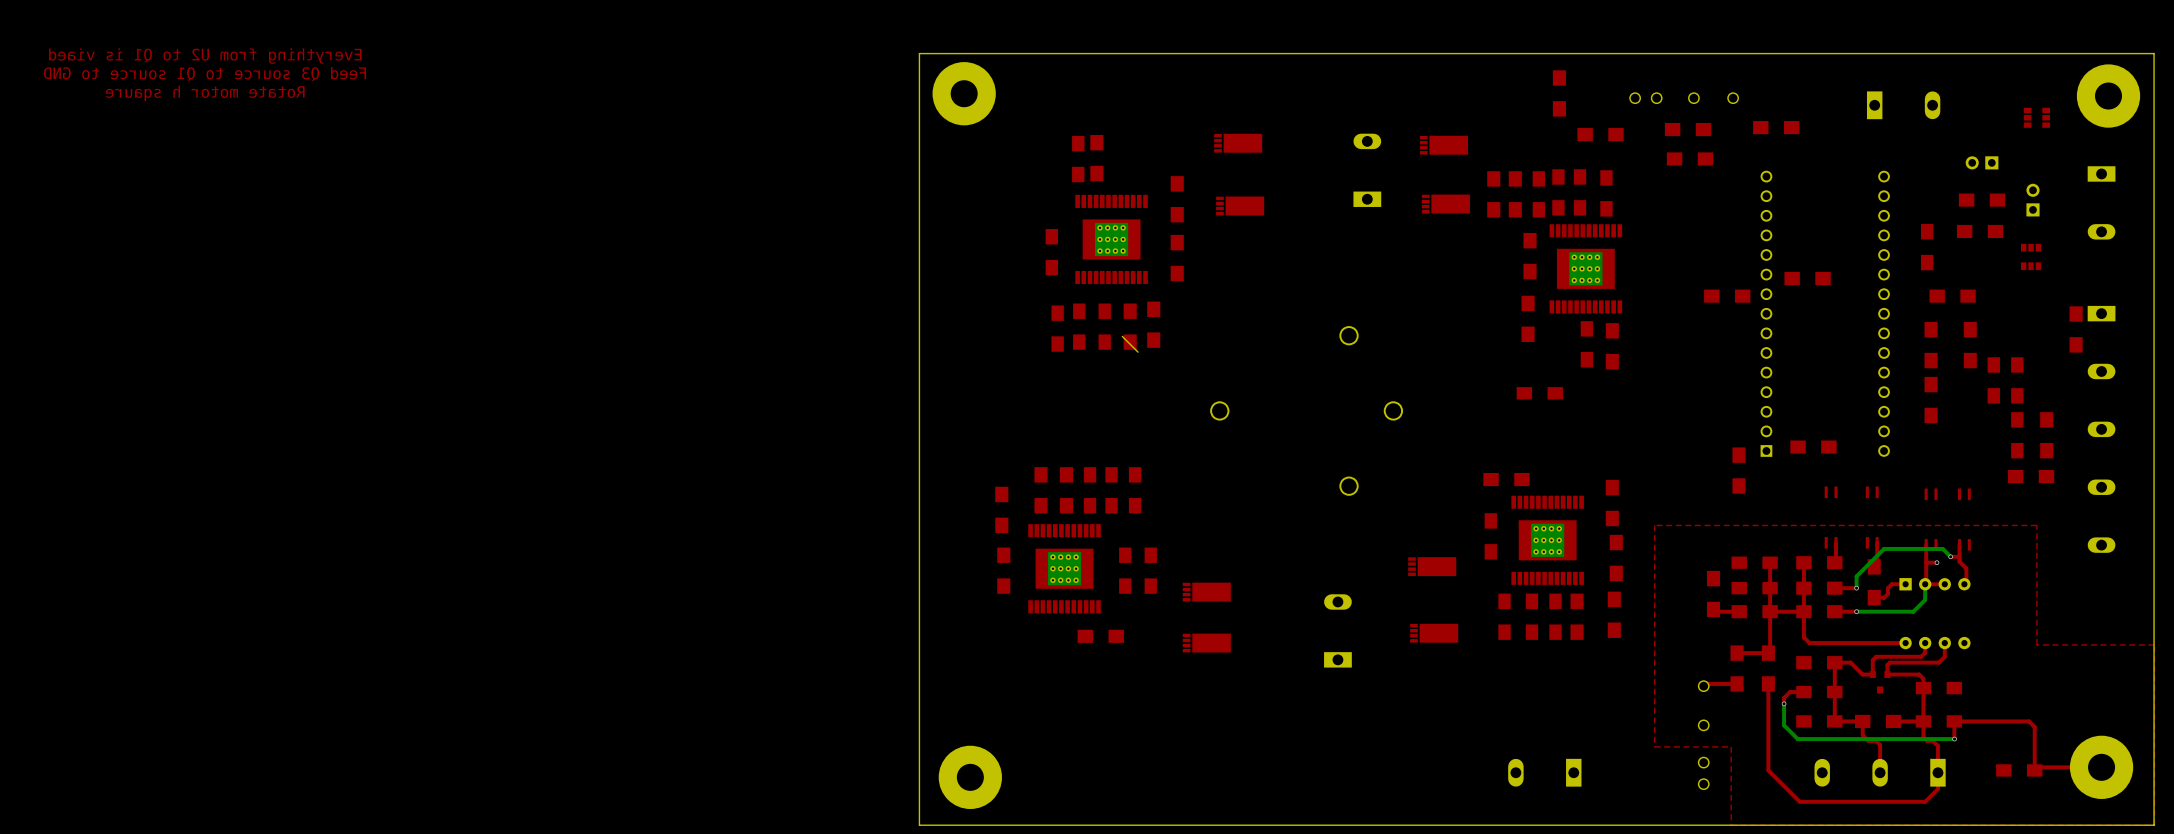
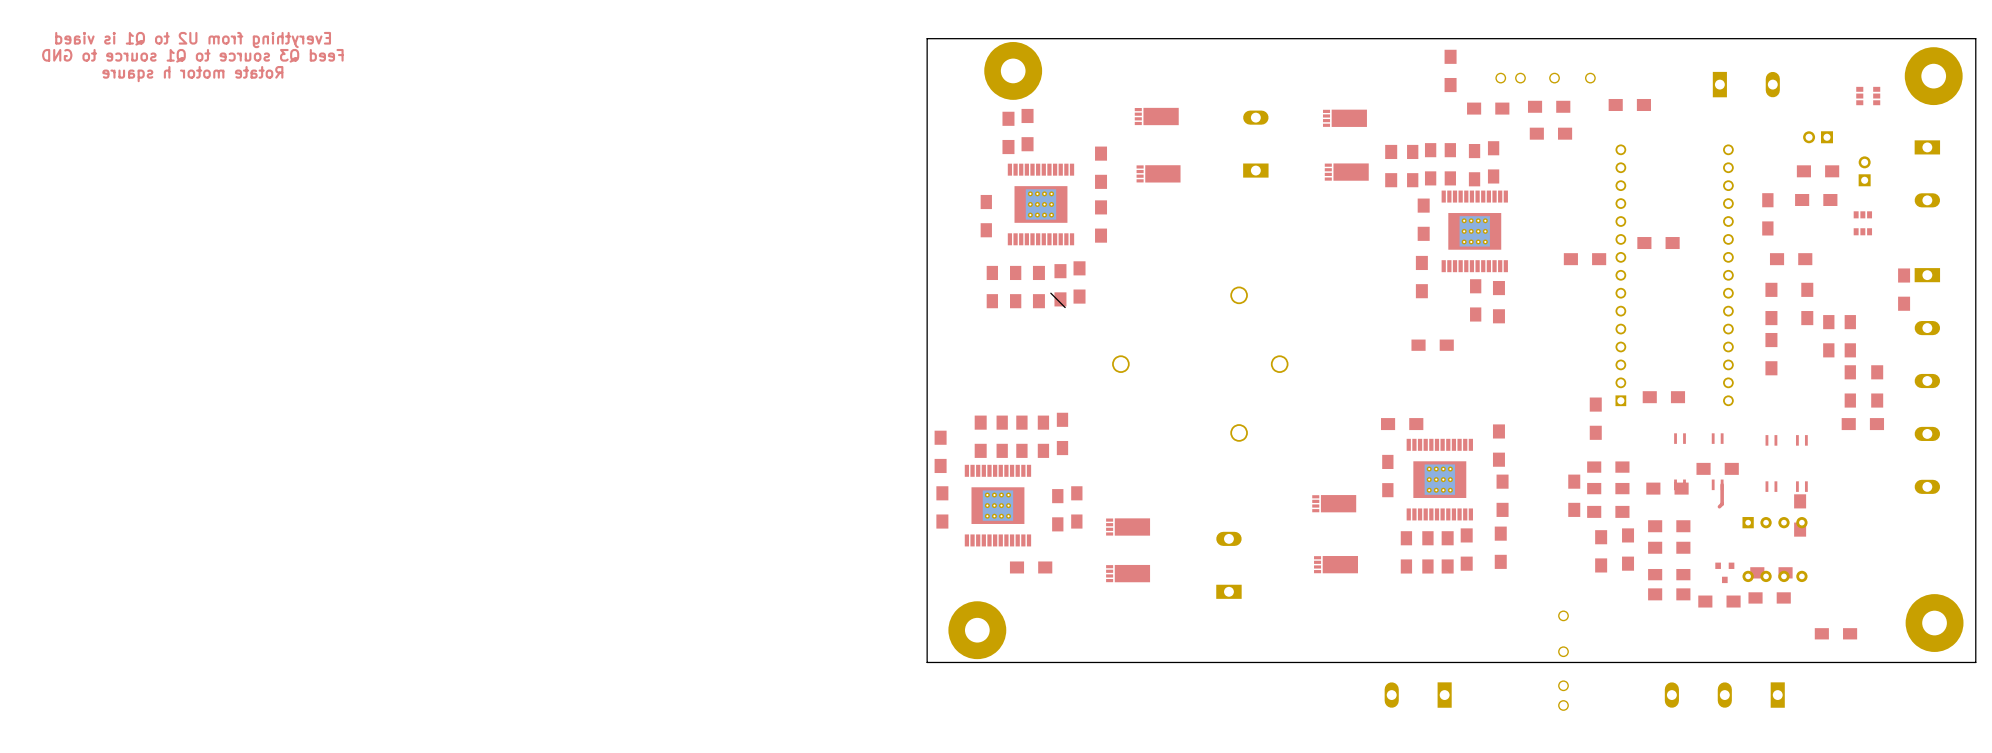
board edge: (2154, 53) (919, 53) (919, 825) (2154, 825) (2154, 53) -> (1975, 38) (1975, 662) (927, 662) (927, 38) (1975, 38)
part position: (964, 93) -> (1013, 70)
part position: (1559, 93) -> (1450, 70)
part position: (1600, 134) -> (1488, 108)
part position: (1238, 143) -> (1156, 116)
part position: (1443, 145) -> (1344, 118)
part: none -> (1027, 130)
part: (1078, 159) -> none
part: none -> (1493, 162)
part: (1493, 194) -> none
part position: (1177, 199) -> (1101, 167)
part position: (1445, 204) -> (1346, 172)
part position: (1240, 205) -> (1158, 173)
part position: (1111, 239) -> (1040, 204)
part position: (1051, 252) -> (986, 216)
part position: (1530, 256) -> (1423, 219)
part position: (1177, 258) -> (1101, 221)
part position: (1585, 268) -> (1474, 231)
part position: (1528, 318) -> (1421, 277)
part: none -> (1079, 282)
part footprint: [1605, 323, 1619, 370] -> [1470, 279, 1482, 322]
part: (1057, 328) -> none
board edge: (1122, 336) (1138, 352) -> (1050, 293) (1065, 307)
part: none -> (1498, 302)
part: (1586, 344) -> none
part position: (1539, 393) -> (1432, 345)
part position: (1506, 479) -> (1402, 424)
part: none -> (1062, 433)
part: (1041, 490) -> none
part position: (1612, 503) -> (1498, 445)
part: none -> (940, 451)
part: (1001, 509) -> none
part: none -> (1608, 467)
part: none -> (1717, 468)
top zone outline: (2036, 525) (2036, 645) (2154, 645) (2154, 825) (1731, 825) (1731, 746) (1654, 746) (1654, 525) (2036, 525) -> none
part position: (1490, 536) -> (1387, 476)
part position: (1547, 540) -> (1439, 479)
top track: (1836, 542) (1834, 562) -> none
top track: (1926, 544) (1926, 583) (1944, 584) -> none
top track: (1959, 544) (1959, 561) (1966, 568) (1966, 582) (1964, 584) -> none
part: none -> (1574, 495)
bottom track: (1950, 556) (1942, 548) (1884, 548) (1856, 576) (1856, 588) -> none
via: (1950, 556) -> none
top track: (1959, 556) (1950, 556) -> none
part position: (1616, 557) -> (1502, 495)
part position: (1754, 562) -> (1608, 488)
top track: (1770, 562) (1770, 651) -> none
top track: (1803, 562) (1803, 637) (1809, 643) (1905, 643) -> none
part position: (1819, 562) -> (1667, 488)
top track: (1936, 562) (1926, 562) -> none
via: (1936, 562) -> none
part position: (1432, 566) -> (1334, 503)
part: none -> (1076, 507)
part position: (1064, 568) -> (997, 505)
part position: (1003, 570) -> (942, 507)
part: (1125, 570) -> none
part: none -> (1608, 511)
part: none -> (1800, 515)
part: (1874, 582) -> none
top track: (1905, 584) (1891, 584) (1884, 597) (1874, 597) -> none
bottom track: (1925, 584) (1925, 599) (1913, 611) (1856, 611) -> none
part: (1754, 588) -> none
top track: (1856, 588) (1834, 588) -> none
via: (1856, 588) -> none
part position: (1206, 592) -> (1128, 527)
part: (1713, 594) -> none
top track: (1713, 609) (1715, 611) (1739, 611) -> none
part: none -> (1500, 547)
part: (1754, 611) -> none
top track: (1803, 611) (1770, 611) -> none
top track: (1856, 611) (1834, 611) -> none
via: (1856, 611) -> none
part: none -> (1466, 549)
part: none -> (1628, 549)
part: (1614, 614) -> none
part: none -> (1601, 551)
part: (1504, 616) -> none
part position: (1434, 633) -> (1336, 564)
part position: (1100, 636) -> (1031, 567)
part: none -> (1771, 572)
part: none -> (1669, 574)
part position: (1206, 643) -> (1128, 573)
top track: (1925, 643) (1925, 652) (1921, 656) (1876, 656) (1872, 660) (1872, 674) (1862, 674) (1850, 662) (1834, 662) (1834, 721) (1862, 721) (1862, 735) (1868, 741) (1876, 741) (1880, 744) (1880, 772) -> none
top track: (1944, 643) (1944, 656) (1938, 662) (1889, 662) (1887, 665) (1887, 674) (1919, 674) (1923, 678) (1923, 737) (1927, 741) (1933, 741) (1937, 745) (1937, 789) (1925, 801) (1799, 801) (1768, 770) (1768, 683) -> none
top track: (1772, 648) (1768, 653) (1737, 653) -> none
part: (1737, 668) -> none
part: (1768, 668) -> none
part: none -> (1719, 601)
part position: (1880, 682) -> (1724, 572)
top track: (1737, 683) (1705, 683) (1703, 686) -> none
part position: (1938, 688) -> (1769, 597)
top track: (1803, 692) (1789, 692) (1784, 697) (1784, 703) -> none
part: (1819, 692) -> none
bottom track: (1784, 703) (1784, 725) (1797, 739) (1954, 739) -> none
via: (1784, 703) -> none
part: none -> (1835, 633)
part: (1819, 721) -> none
part: (1878, 721) -> none
top track: (1923, 721) (1893, 721) -> none
part: (1938, 721) -> none
top track: (1954, 739) (1954, 721) (2029, 721) (2034, 727) (2034, 770) (2037, 767) (2101, 767) -> none
via: (1954, 739) -> none
part position: (2101, 767) -> (1934, 623)
part: (2019, 770) -> none
part position: (970, 777) -> (977, 630)

